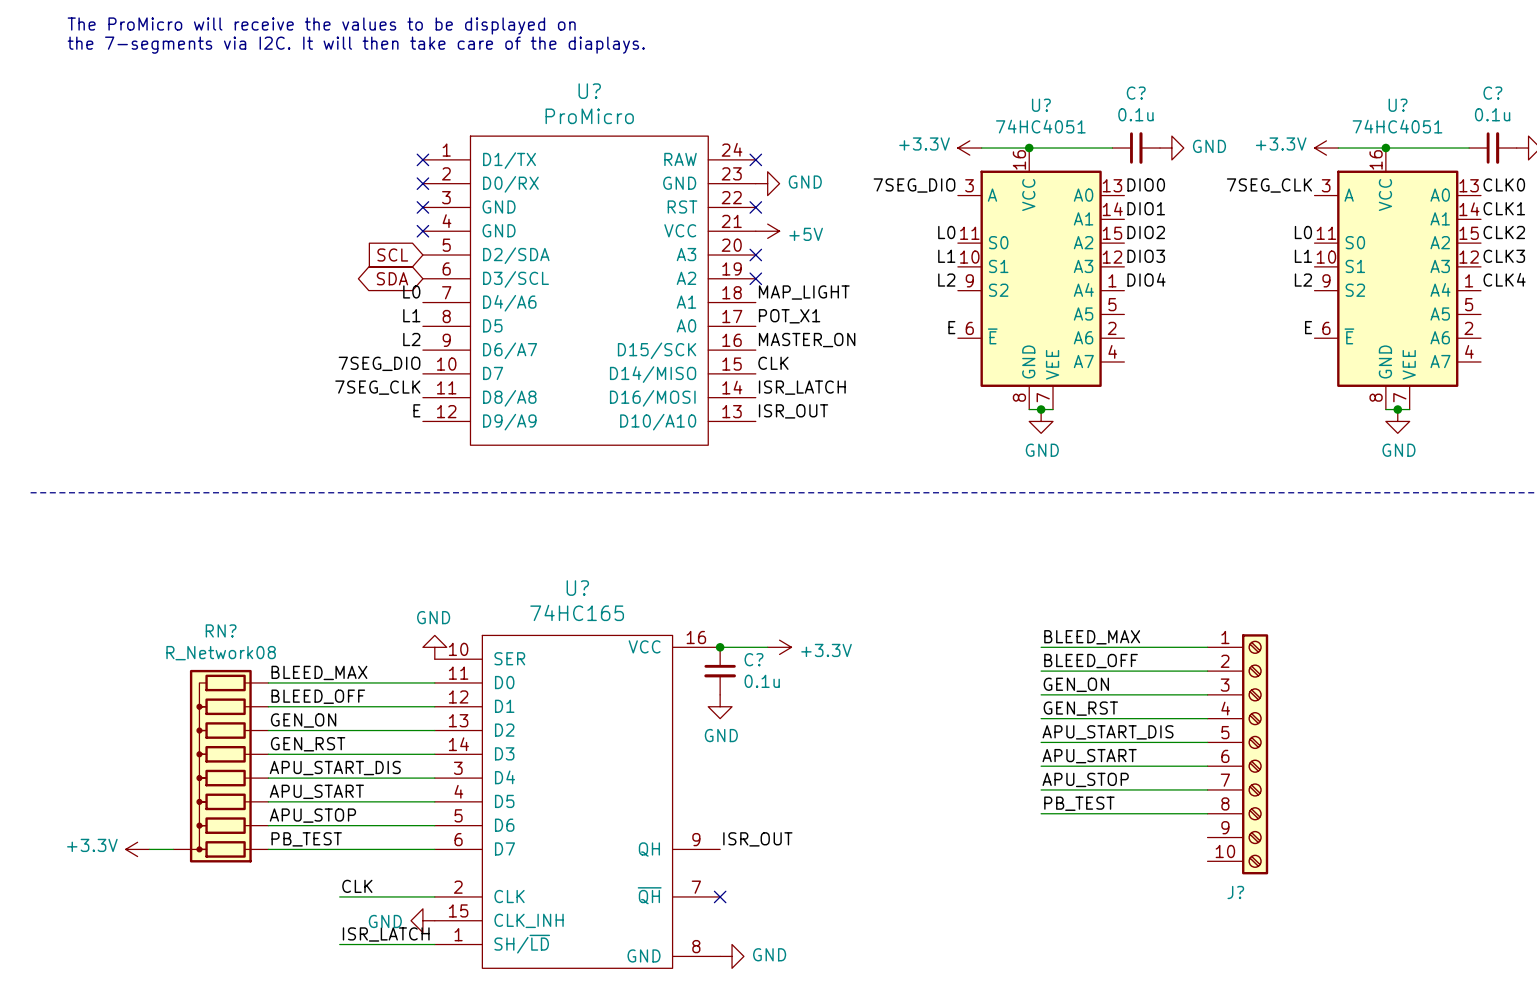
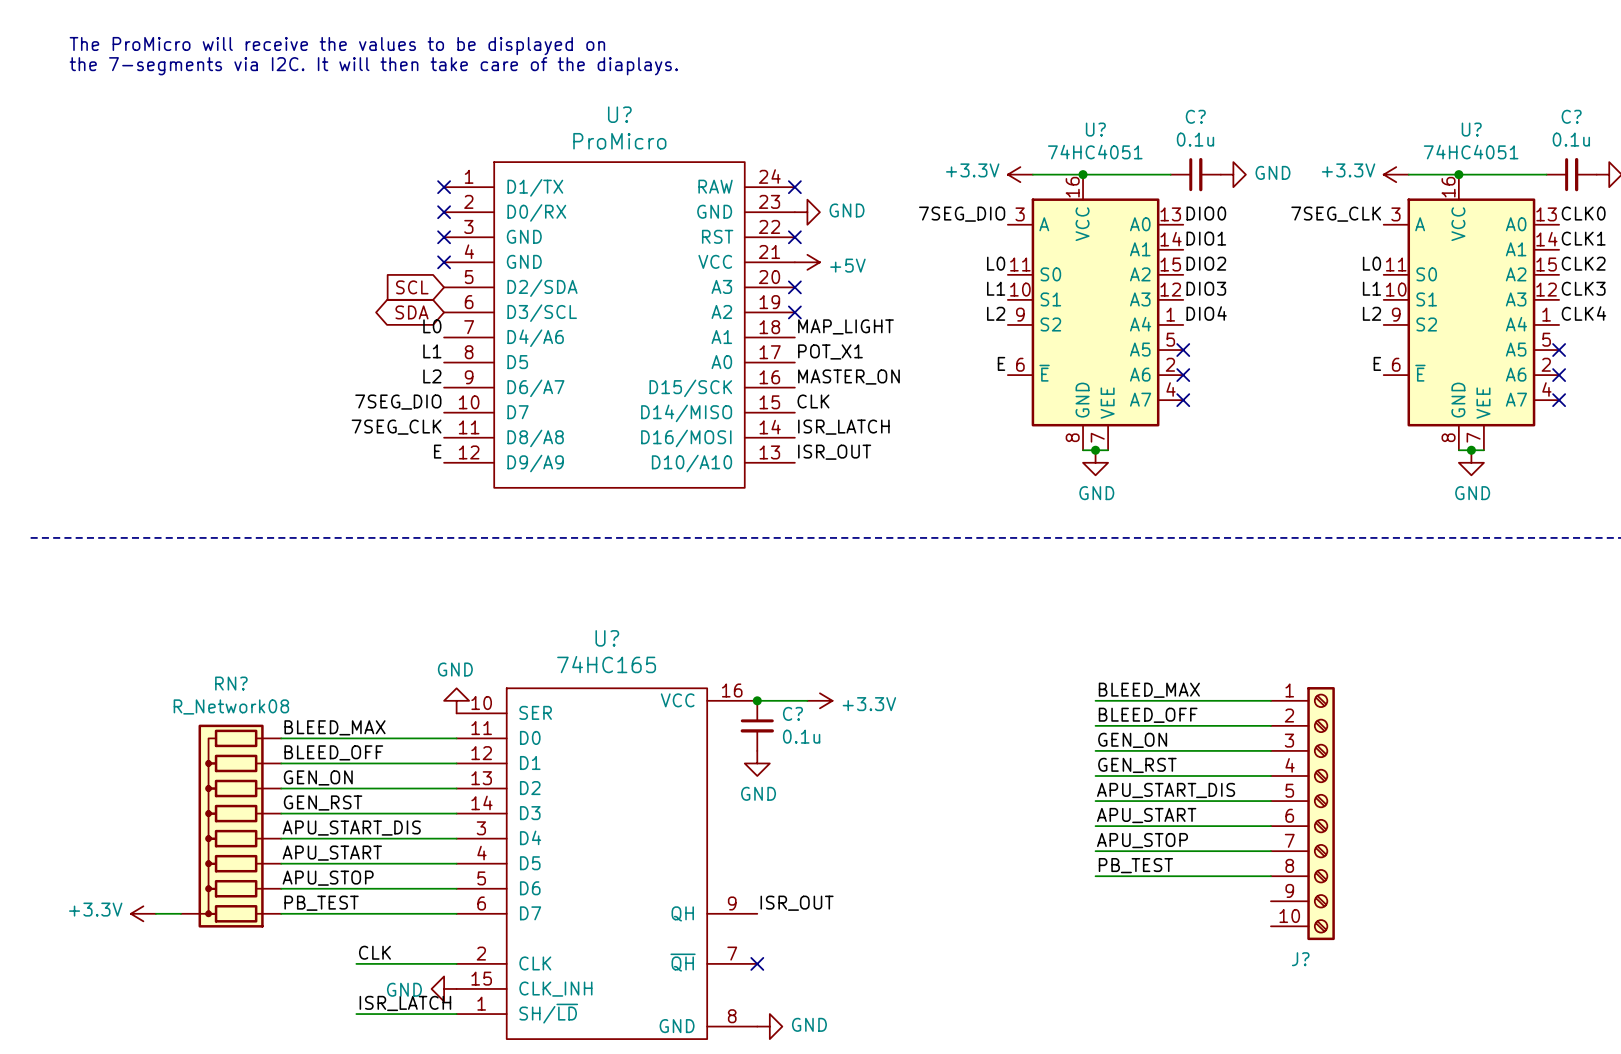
no-connect mark: none -> (1183, 350)
no-connect mark: none -> (1559, 350)
no-connect mark: none -> (1183, 375)
no-connect mark: none -> (1559, 375)
no-connect mark: none -> (1183, 400)
no-connect mark: none -> (1559, 400)

